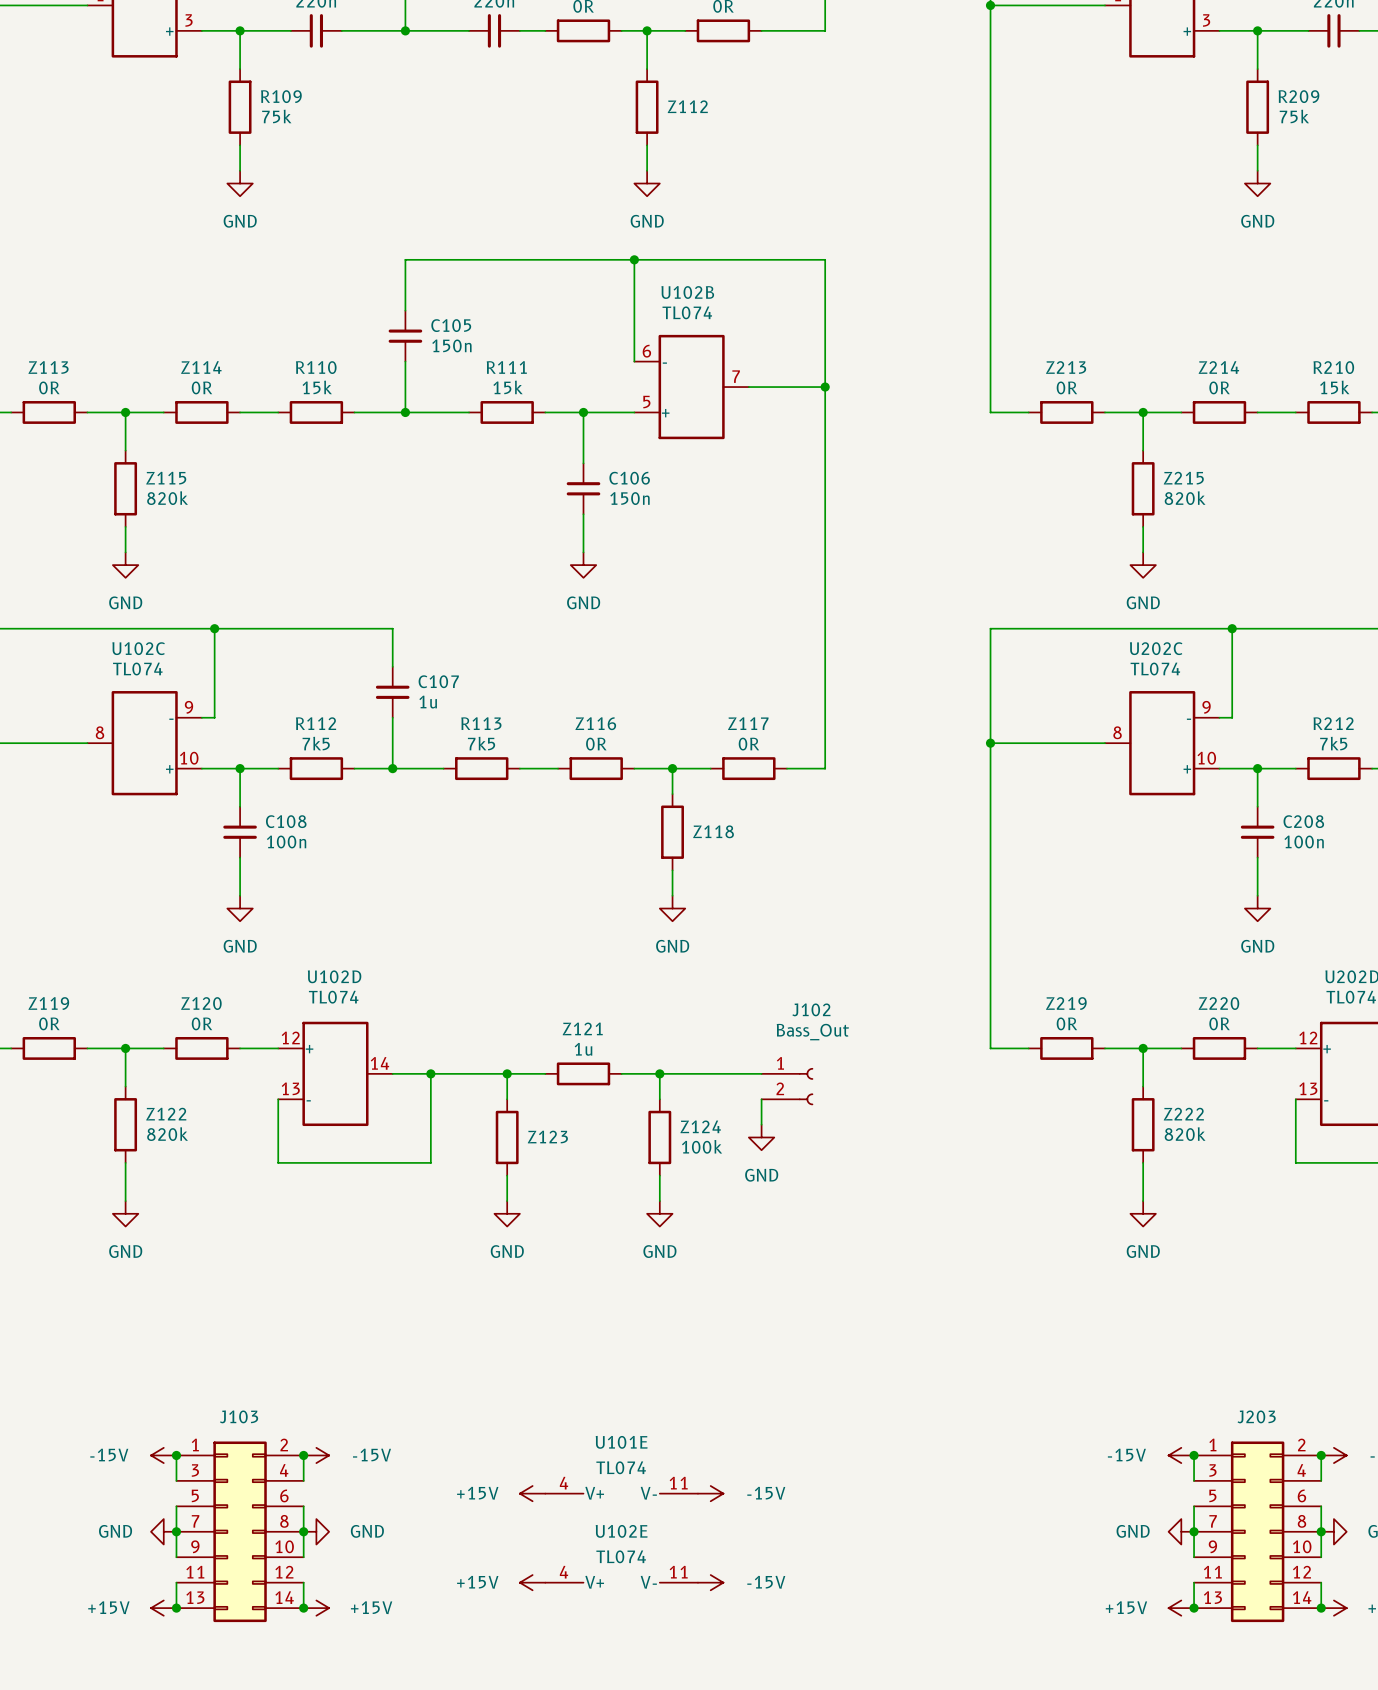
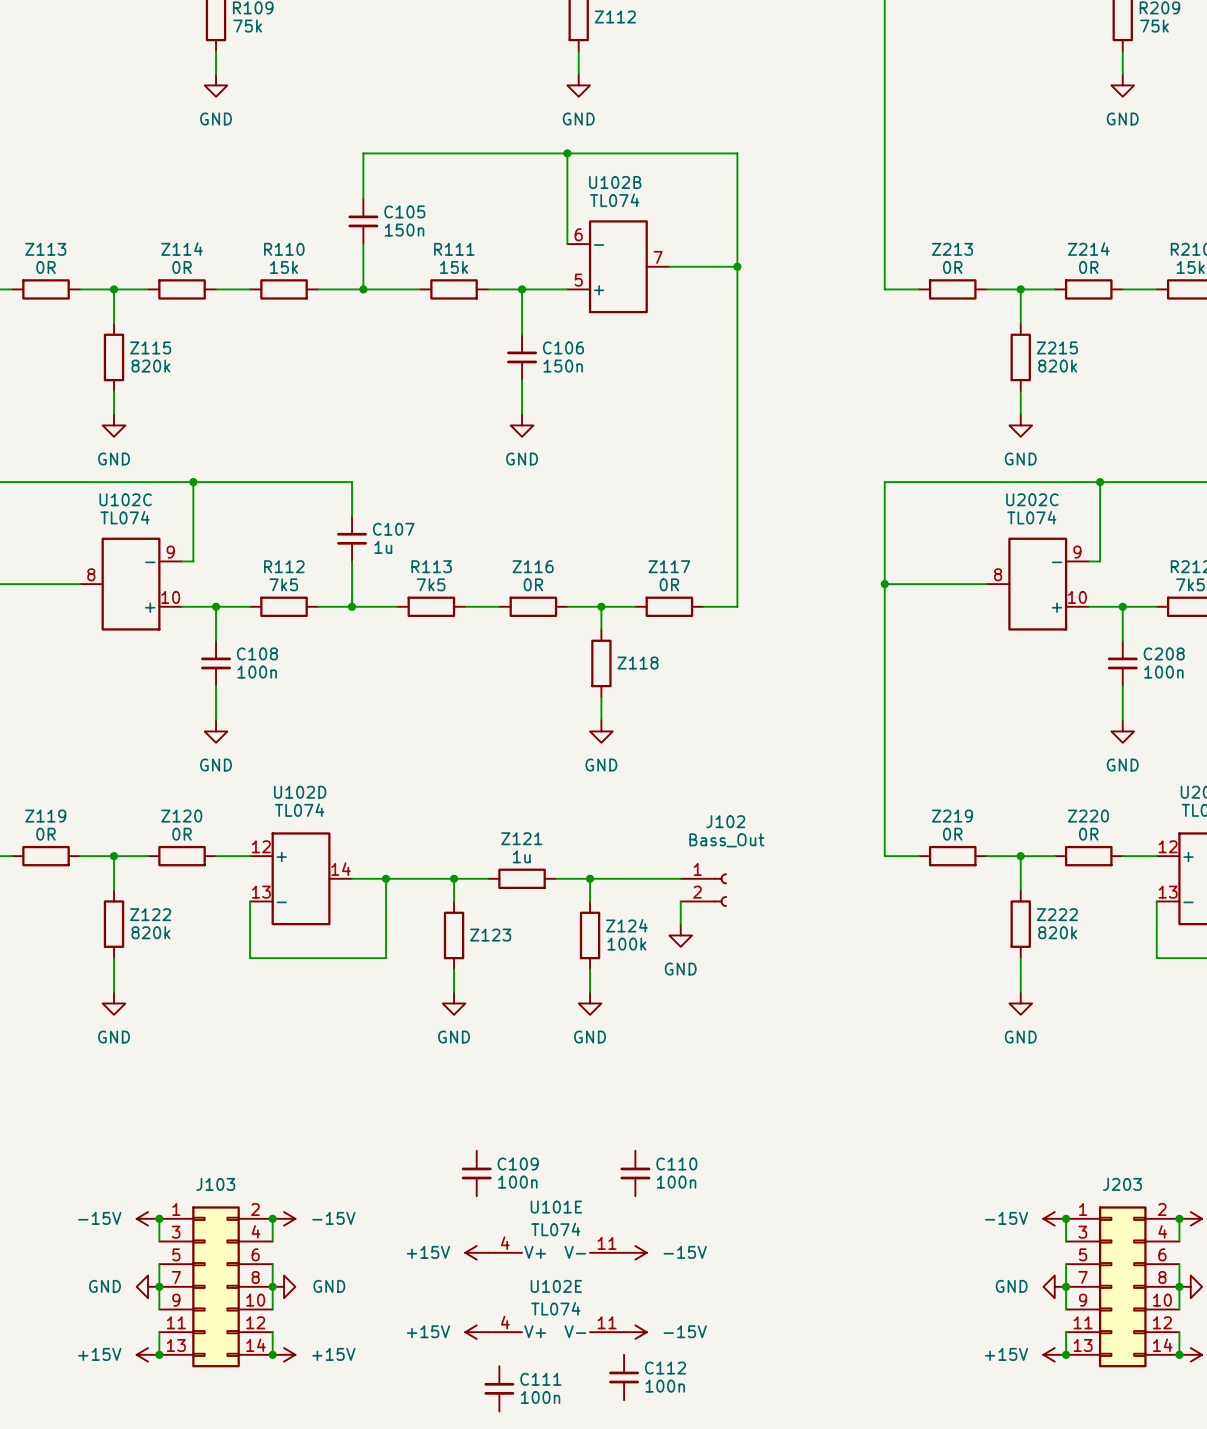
C109: none -> 100n (476, 1173)
C110: none -> 100n (635, 1173)
C112: none -> 100n (624, 1377)
C111: none -> 100n (499, 1388)

